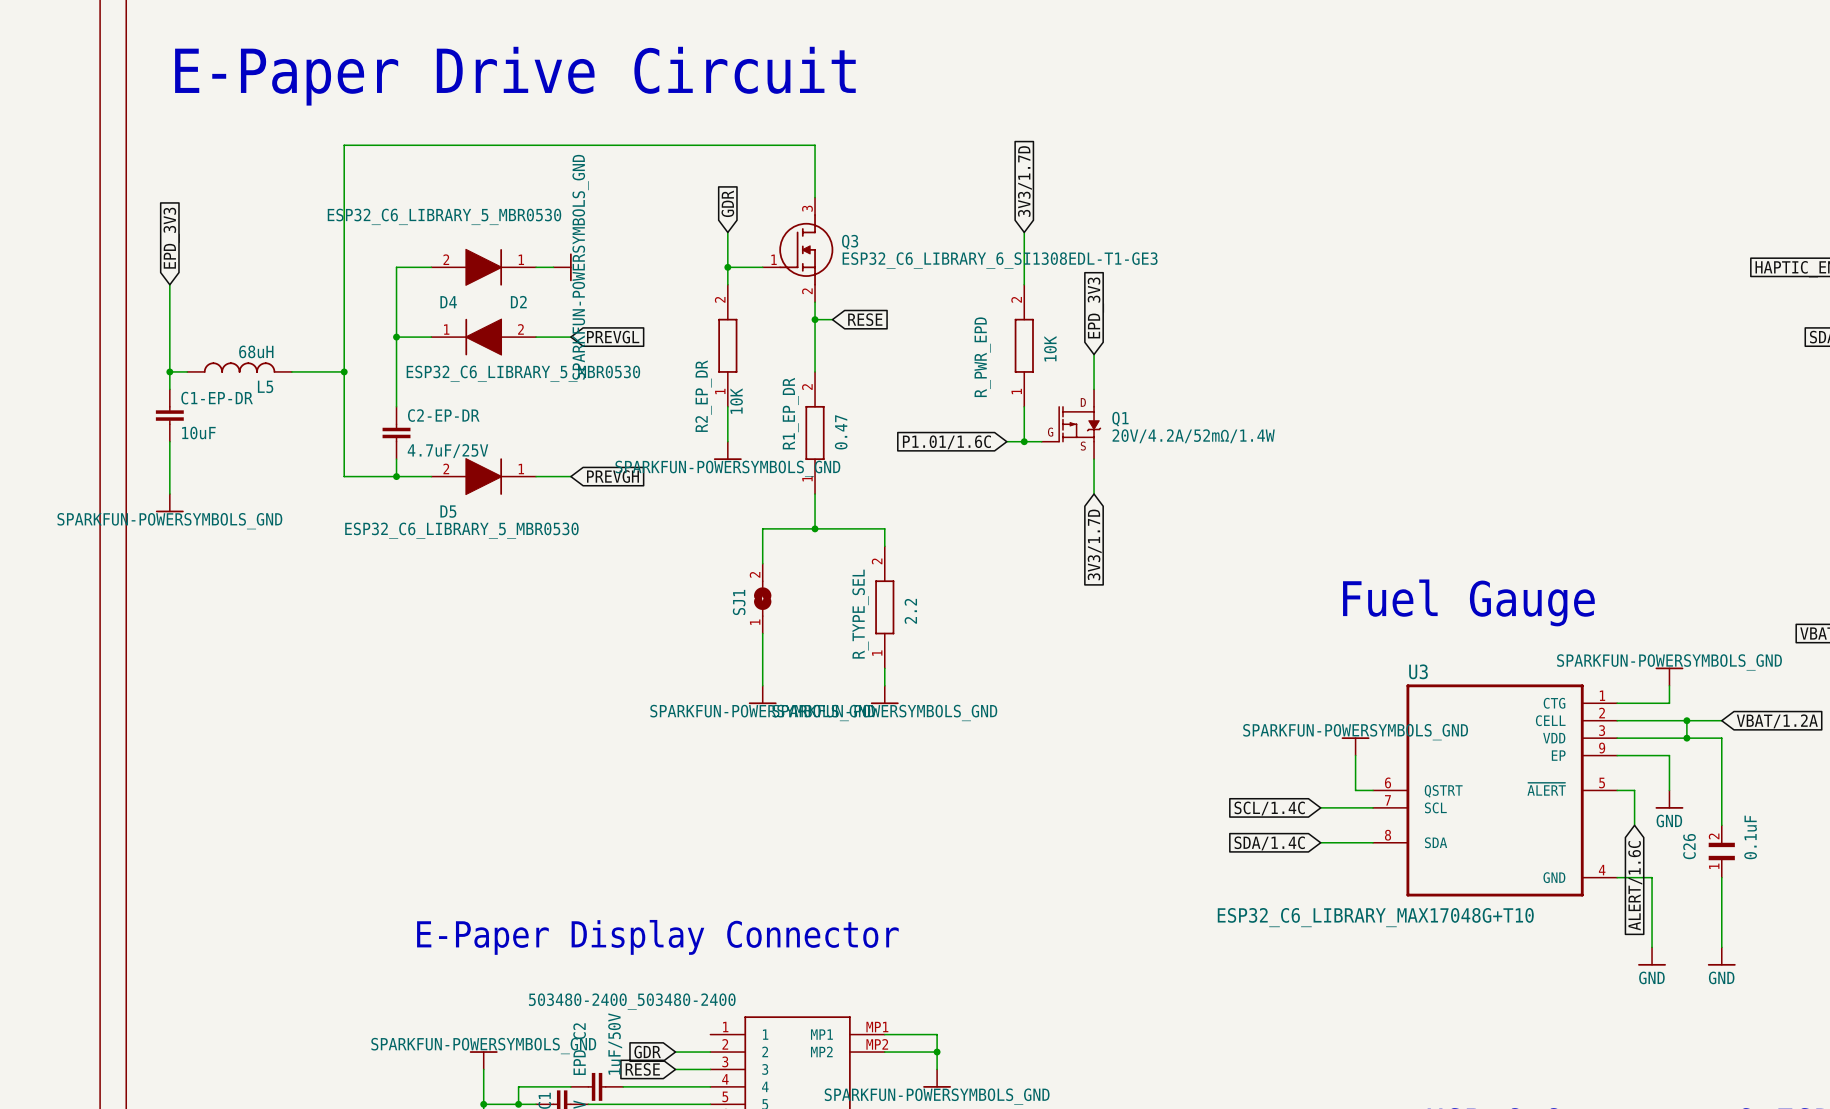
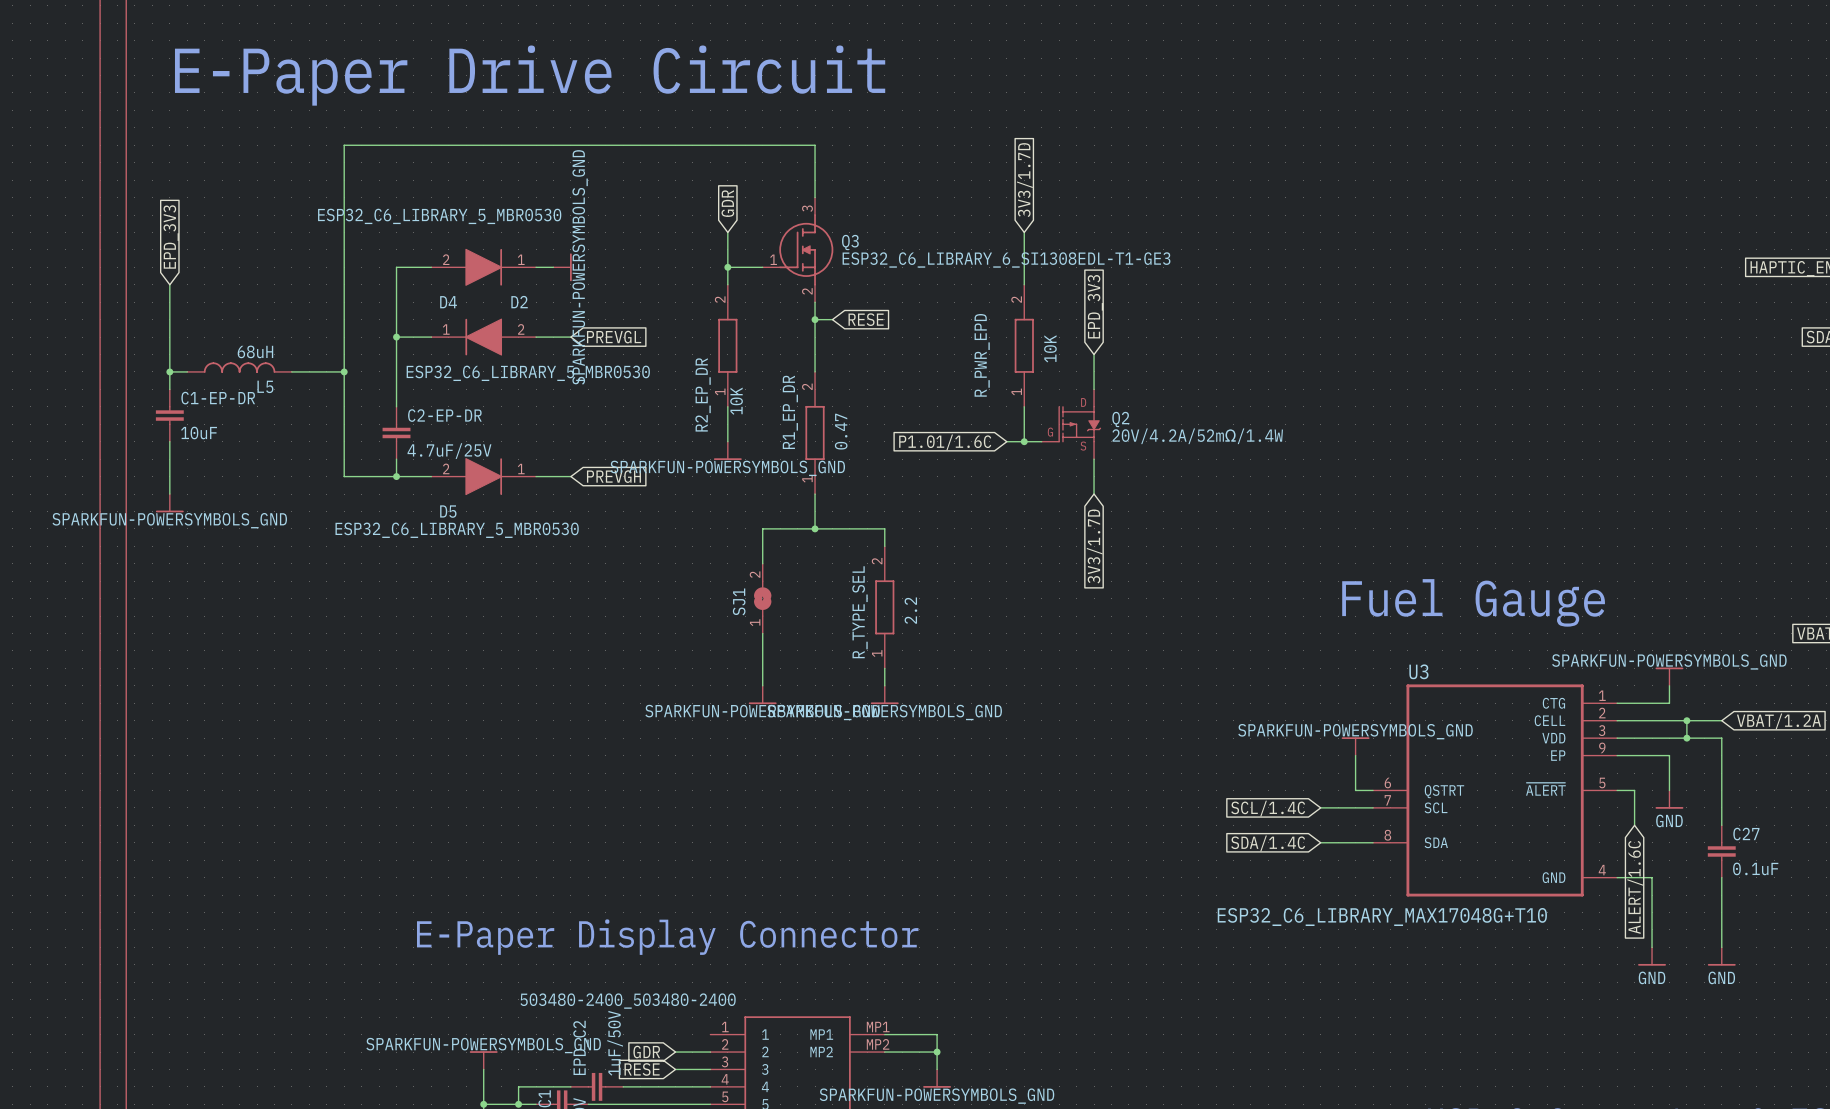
Q1 name: Q1 (1120, 419) -> Q2 (1120, 419)
C26: 0.1uF (1721, 851) -> none
C27: none -> 0.1uF (1721, 851)

